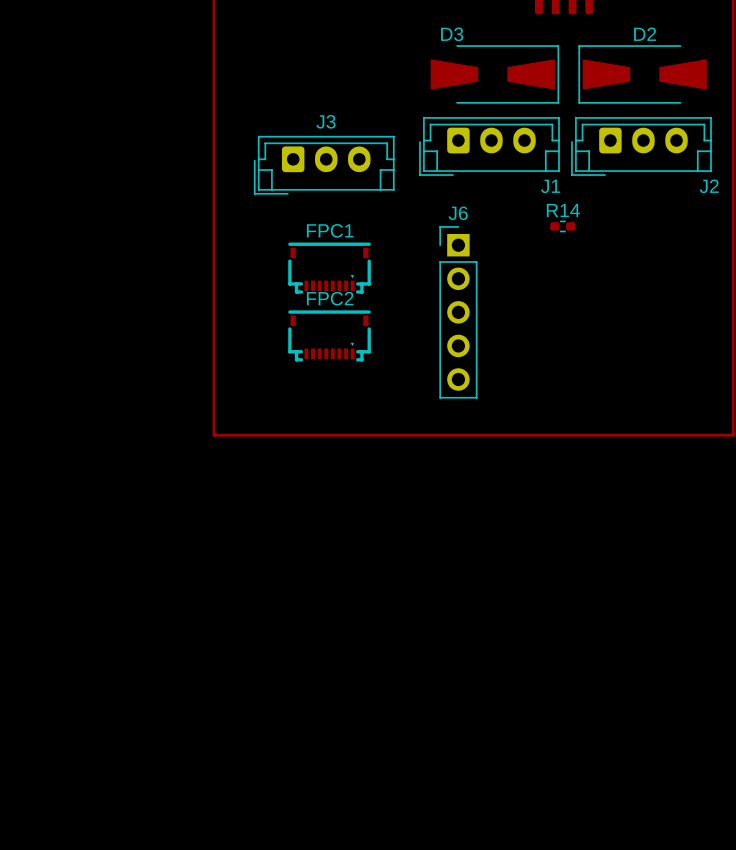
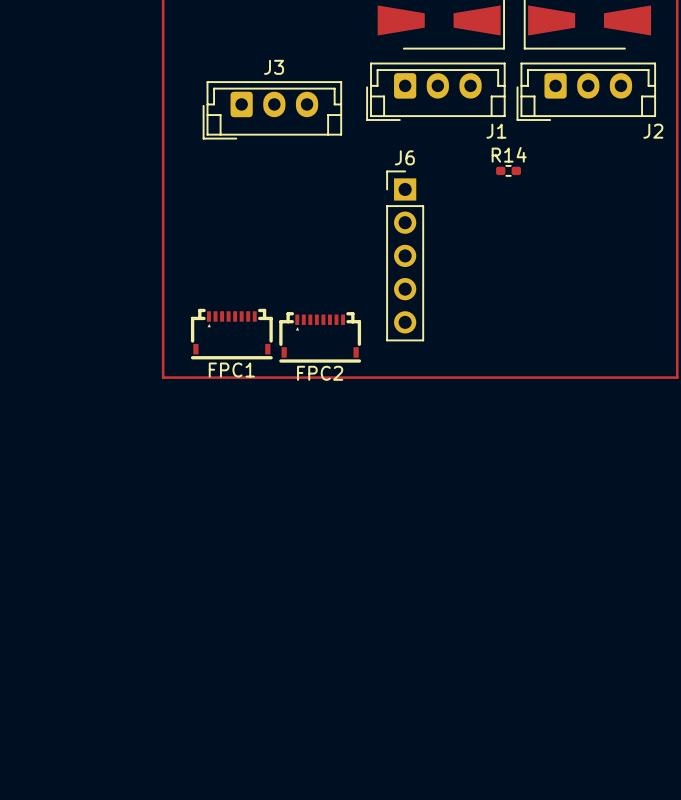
FPC1 rotation: 0° (329, 268) -> 180° (231, 334)
FPC1 position: (329, 268) -> (231, 334)
FPC2 rotation: 0° (329, 335) -> 180° (320, 337)
FPC2 position: (329, 335) -> (320, 337)

